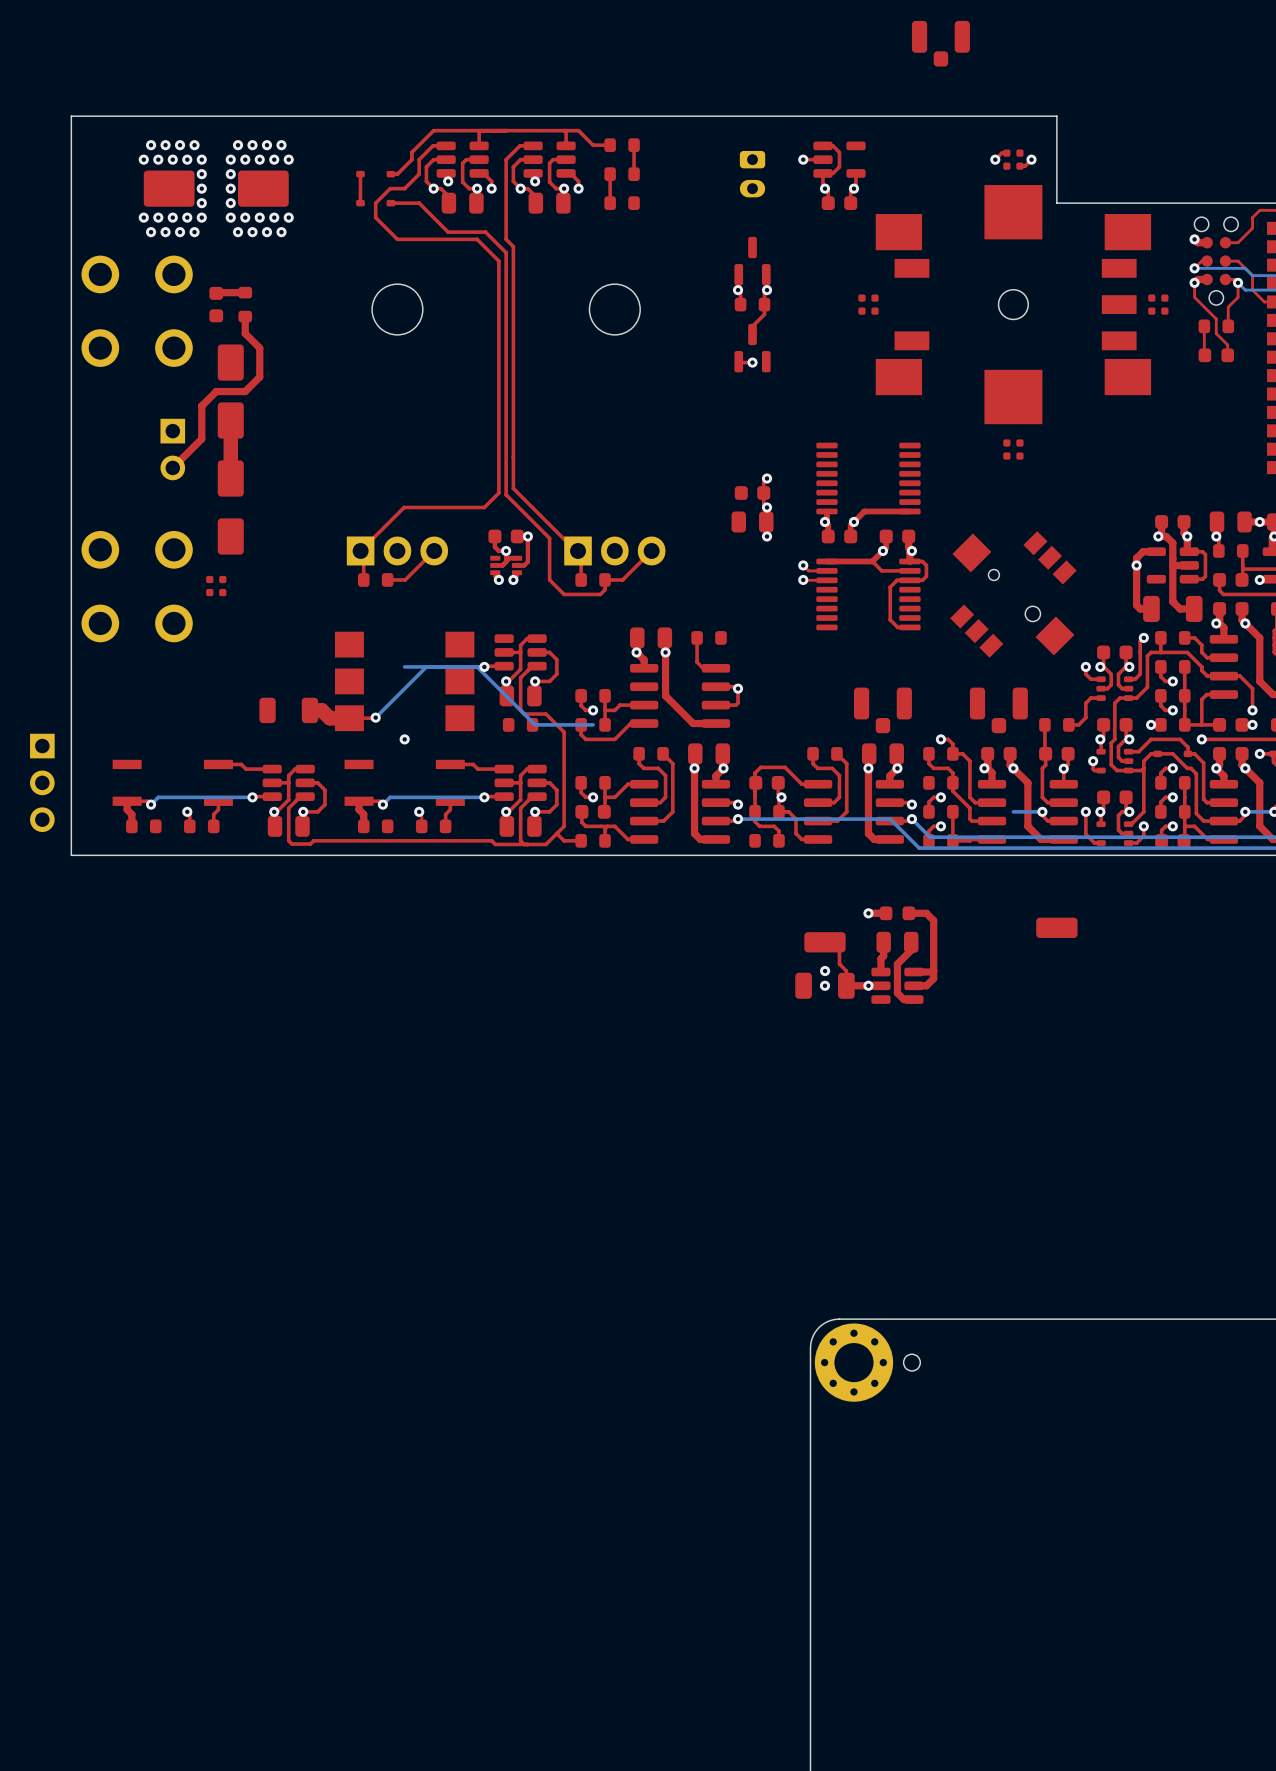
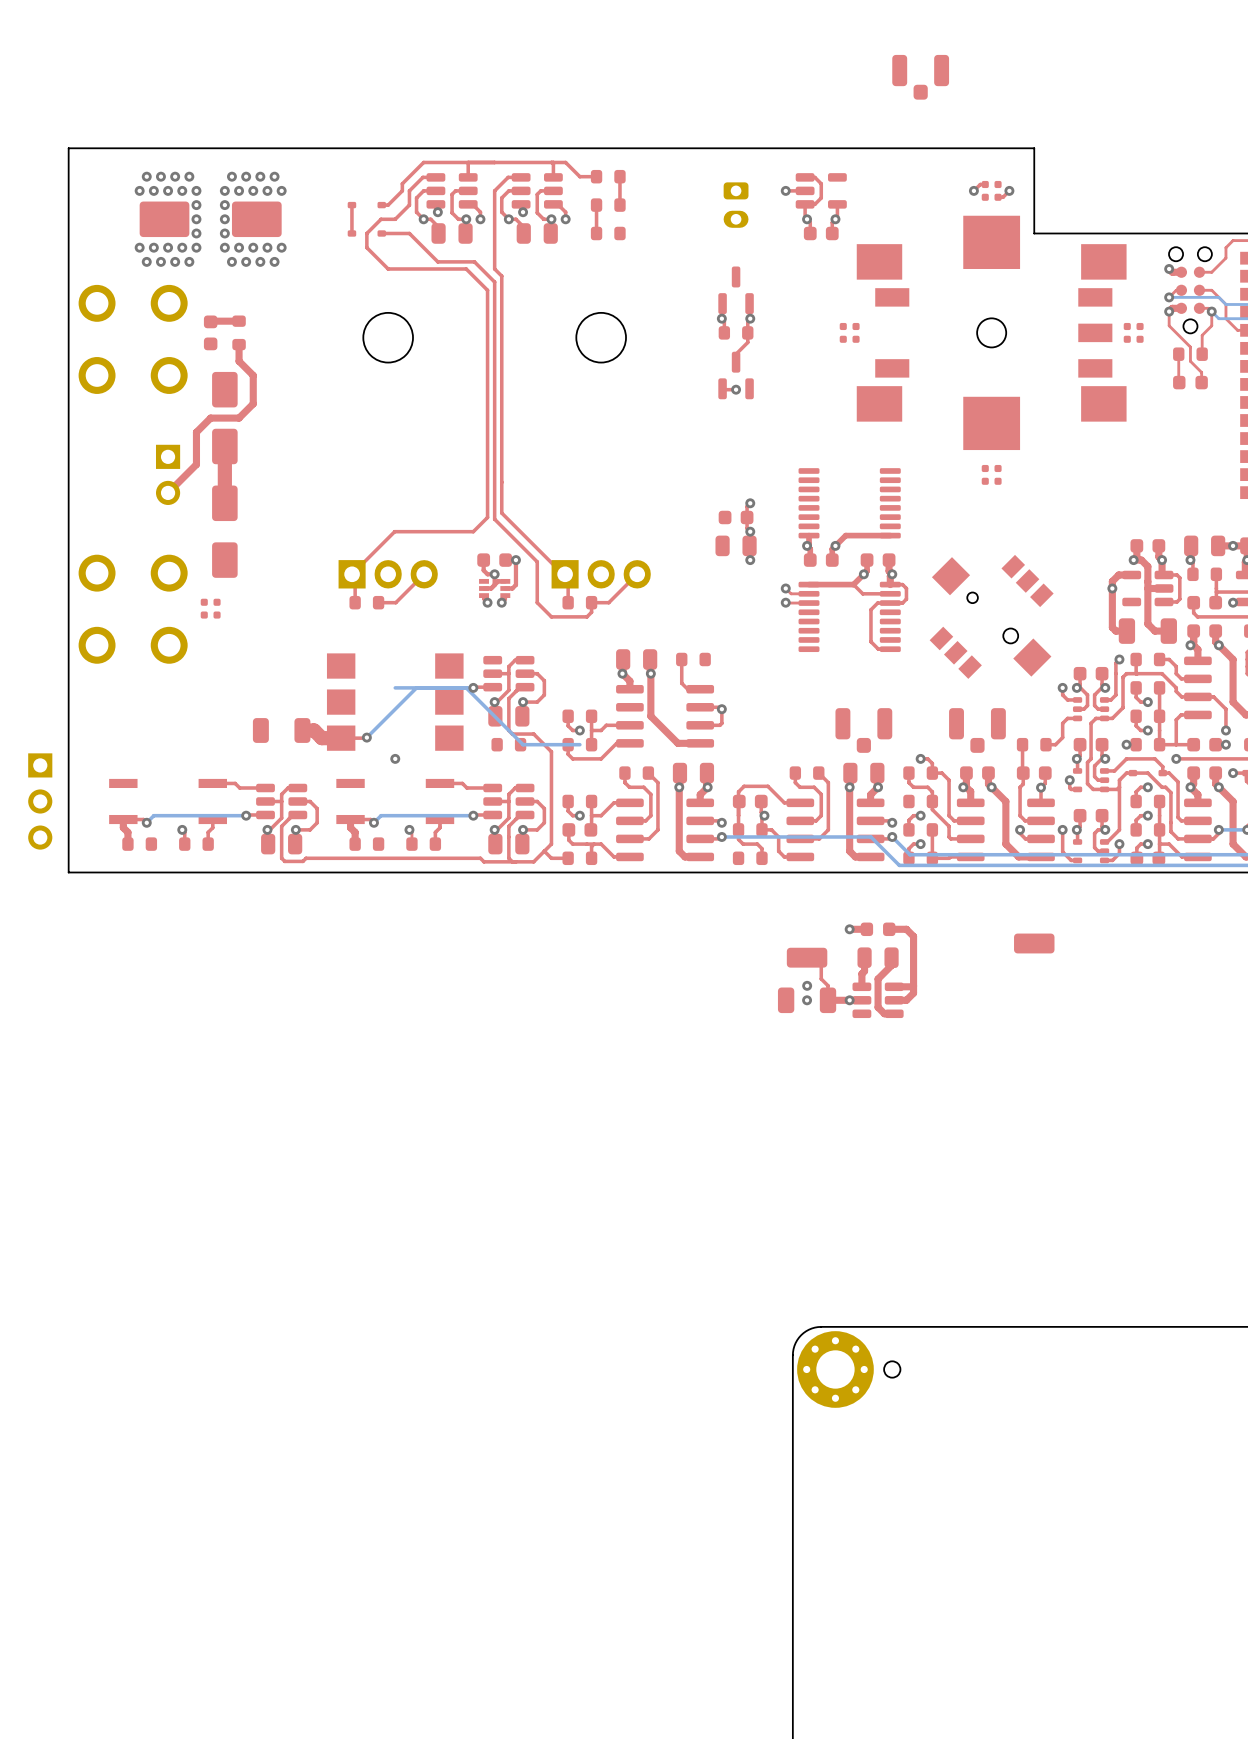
bottom track: (1042, 811) (1013, 811) -> none

